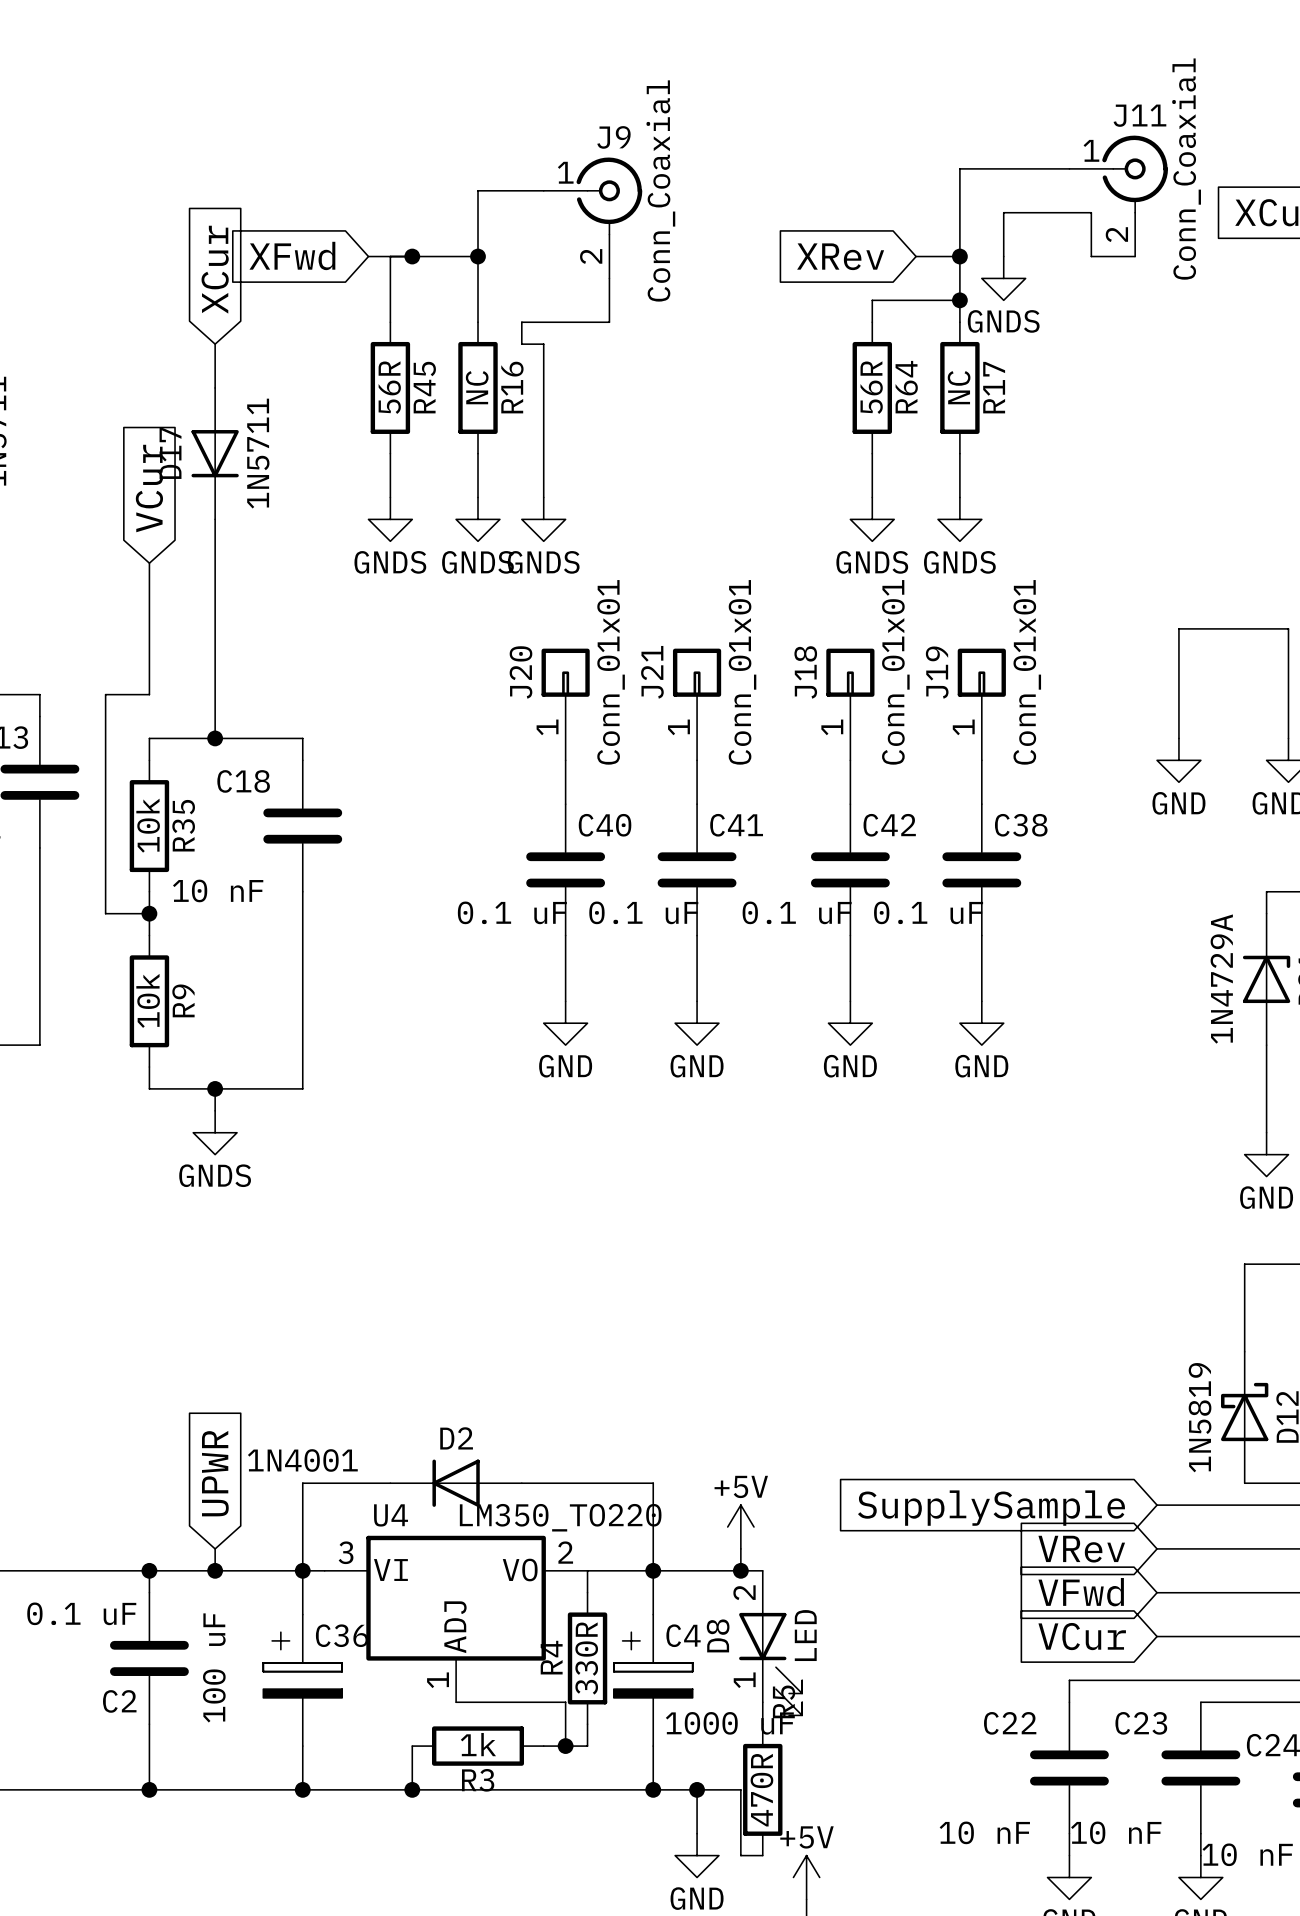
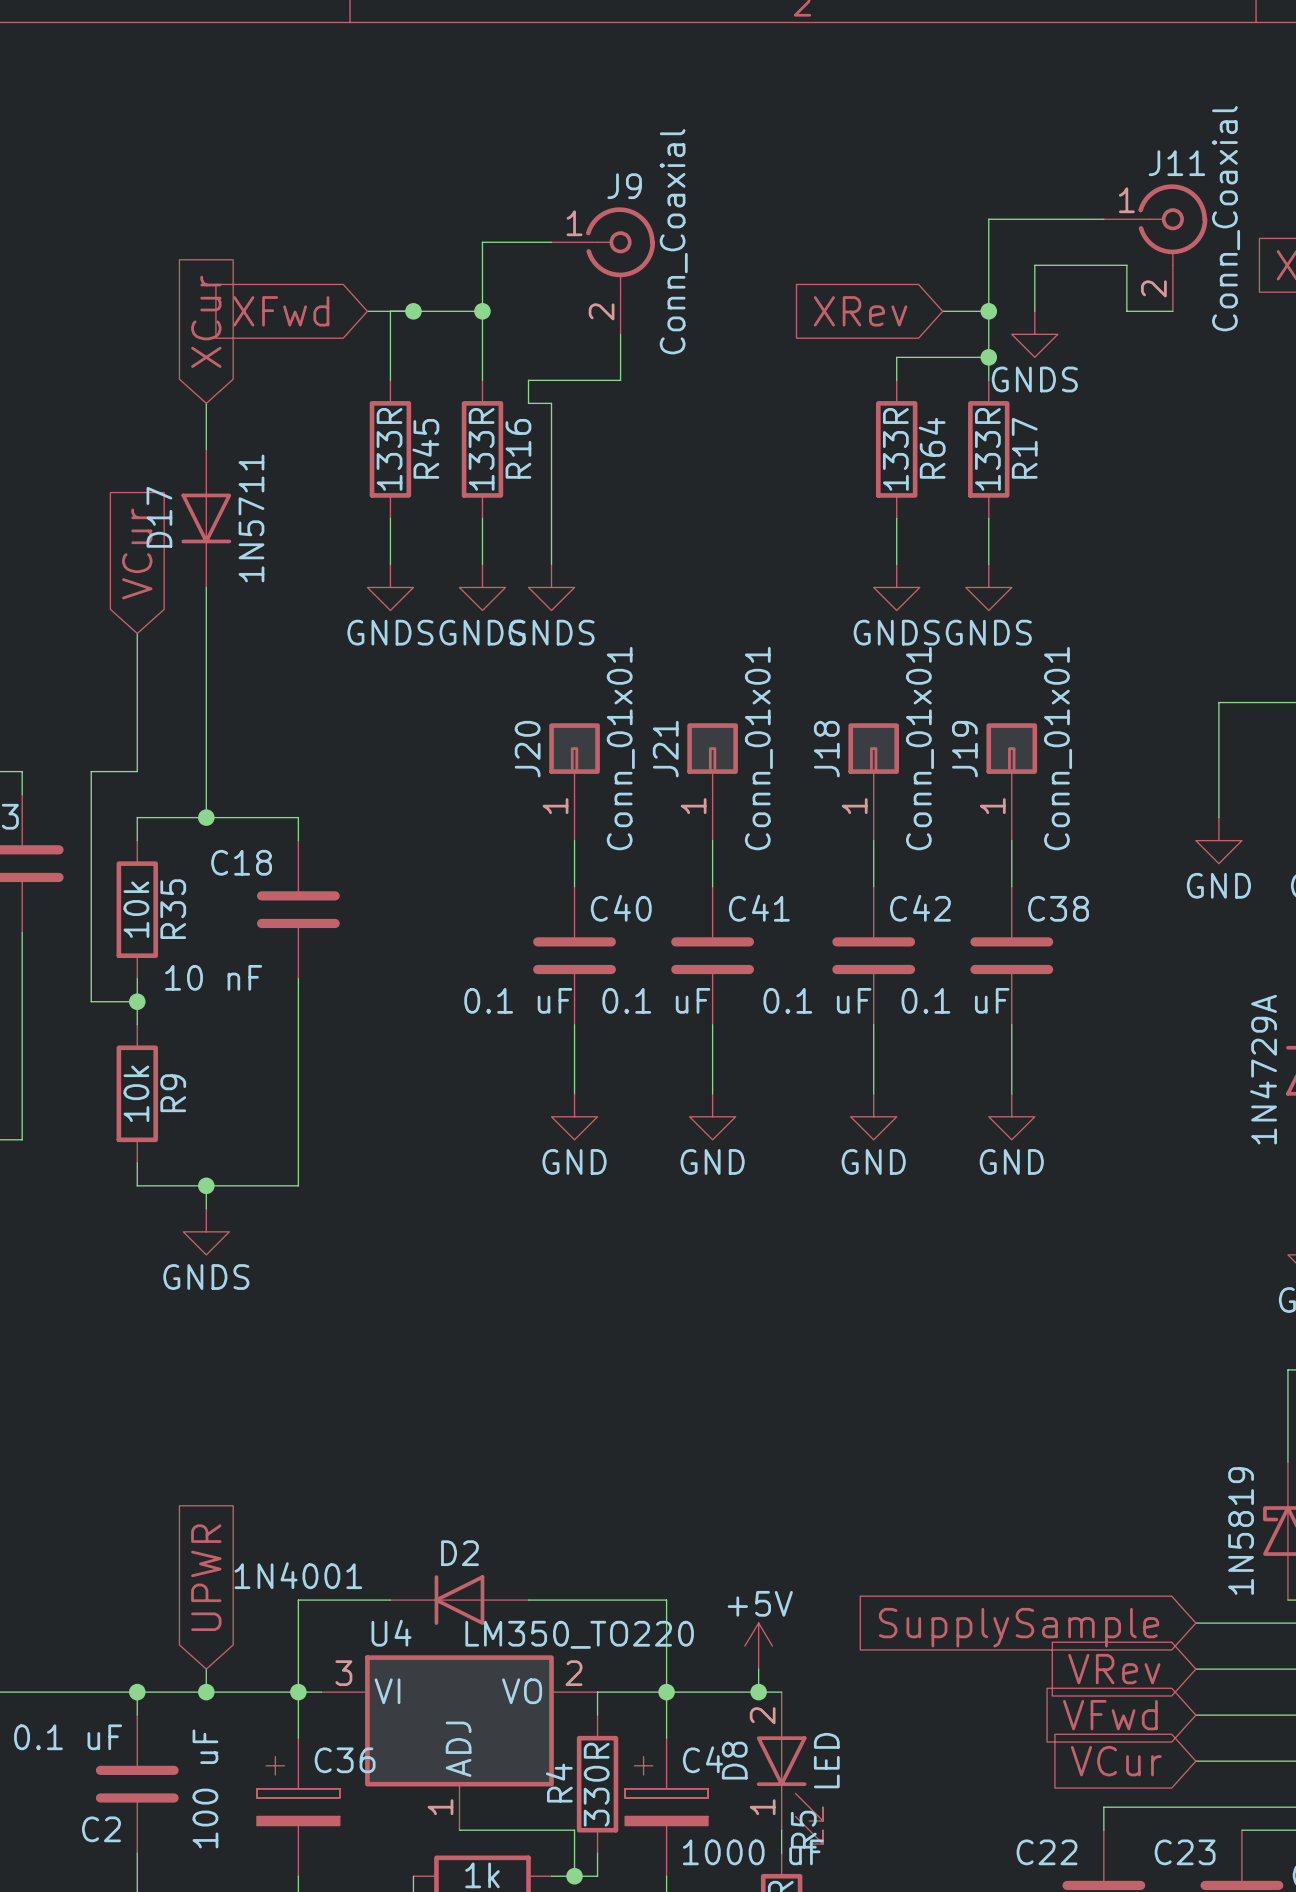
R45 value: 56R (389, 387) -> 133R (389, 449)
R16 value: NC (477, 387) -> 133R (481, 449)
R64 value: 56R (871, 387) -> 133R (895, 449)
R17 value: NC (959, 387) -> 133R (987, 449)

